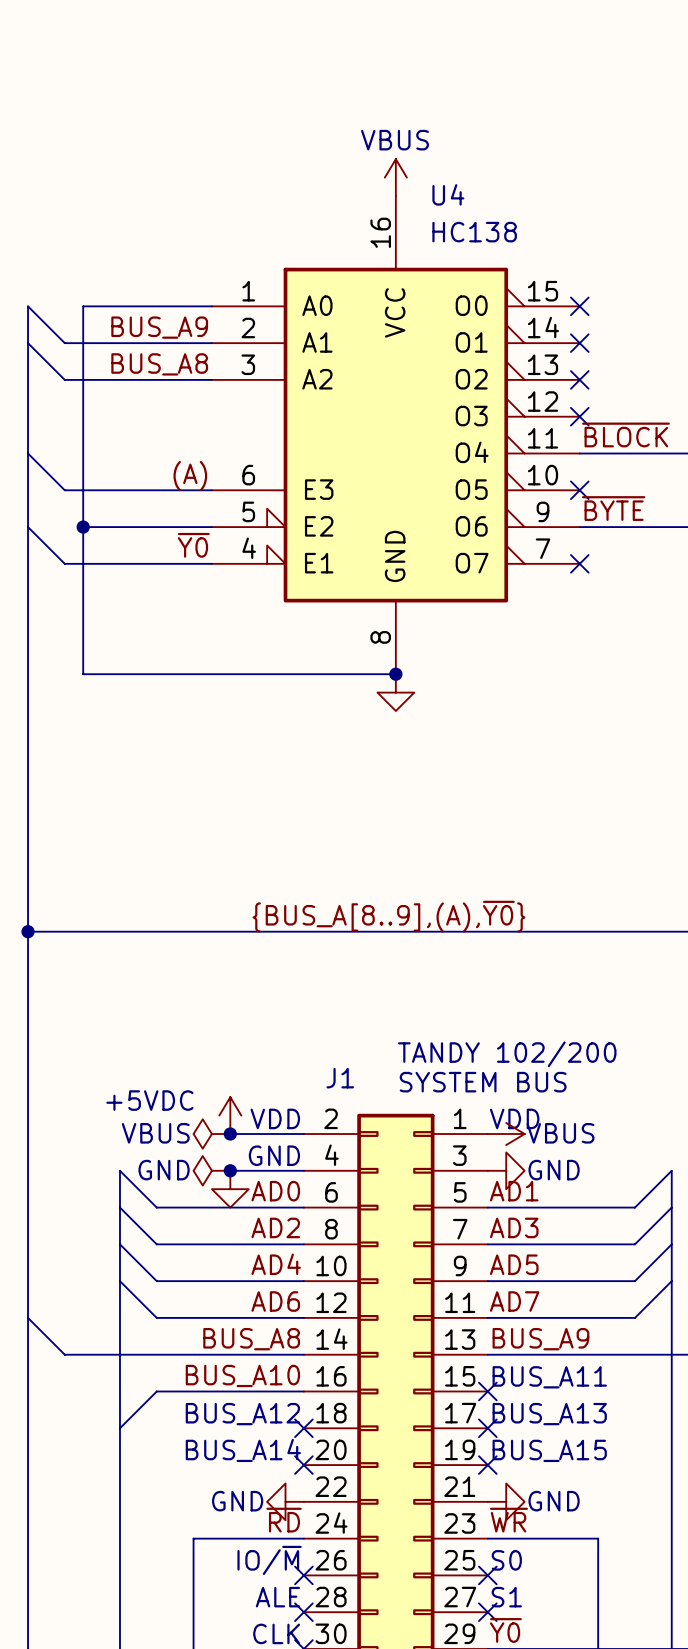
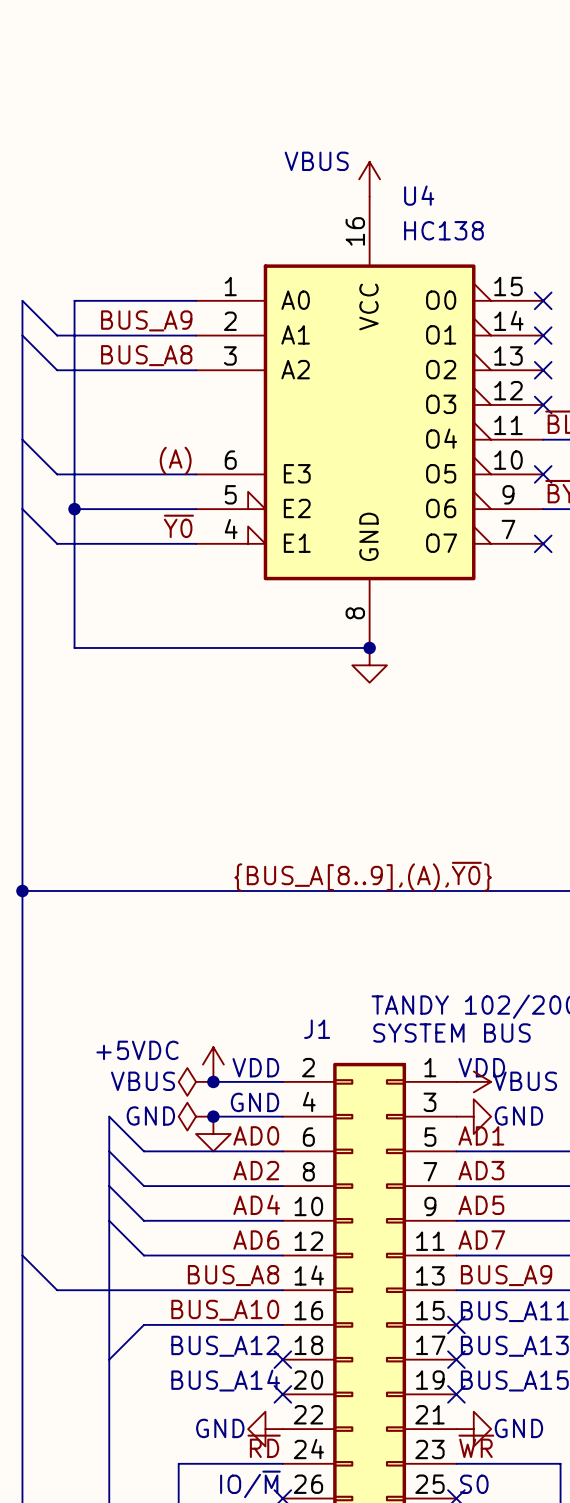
power symbol text position: VBUS (394, 140) -> VBUS (316, 161)

